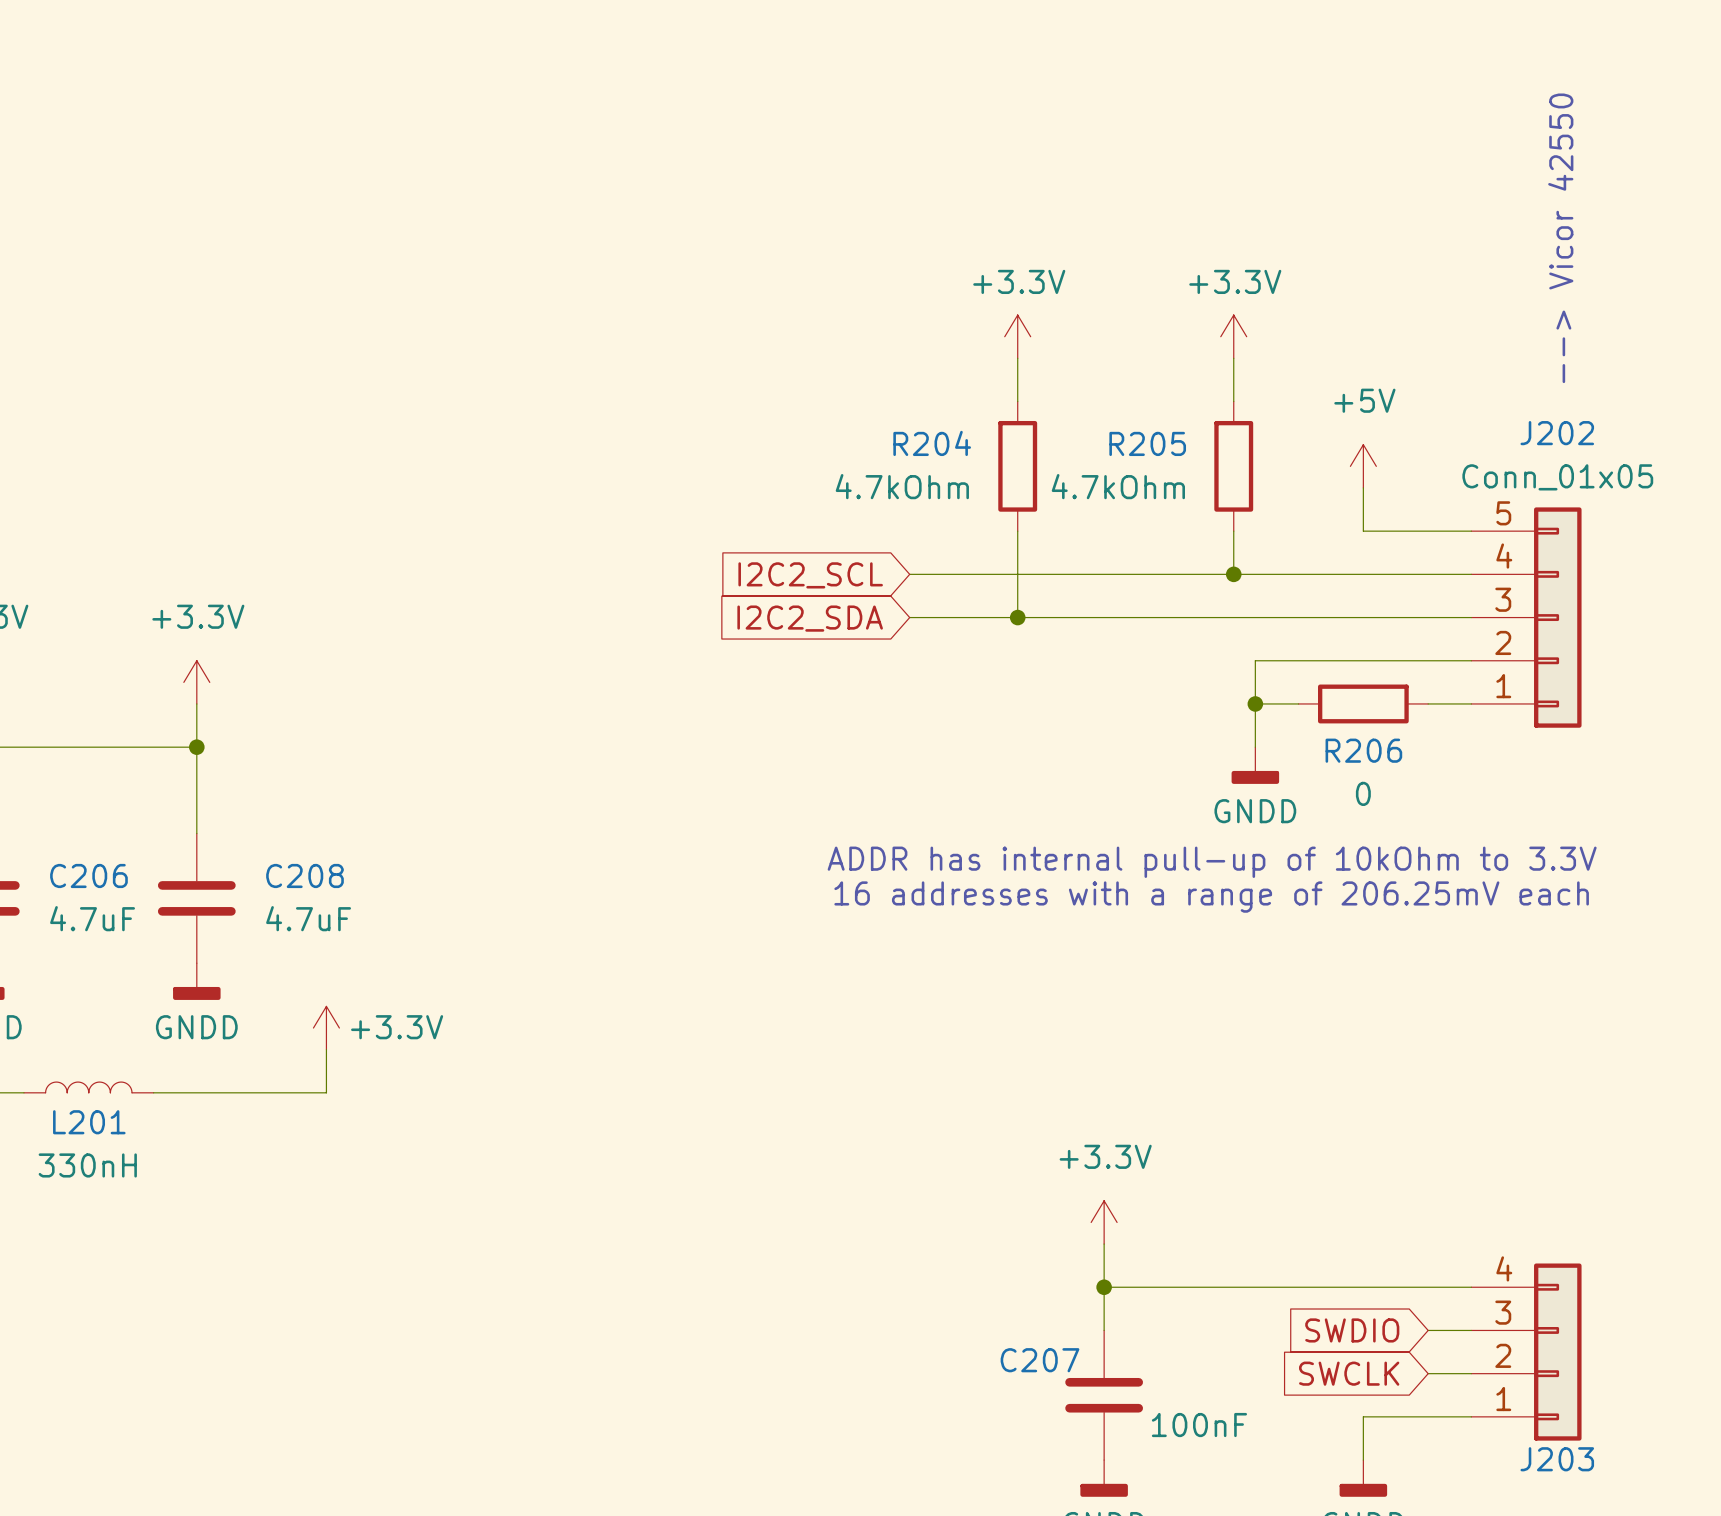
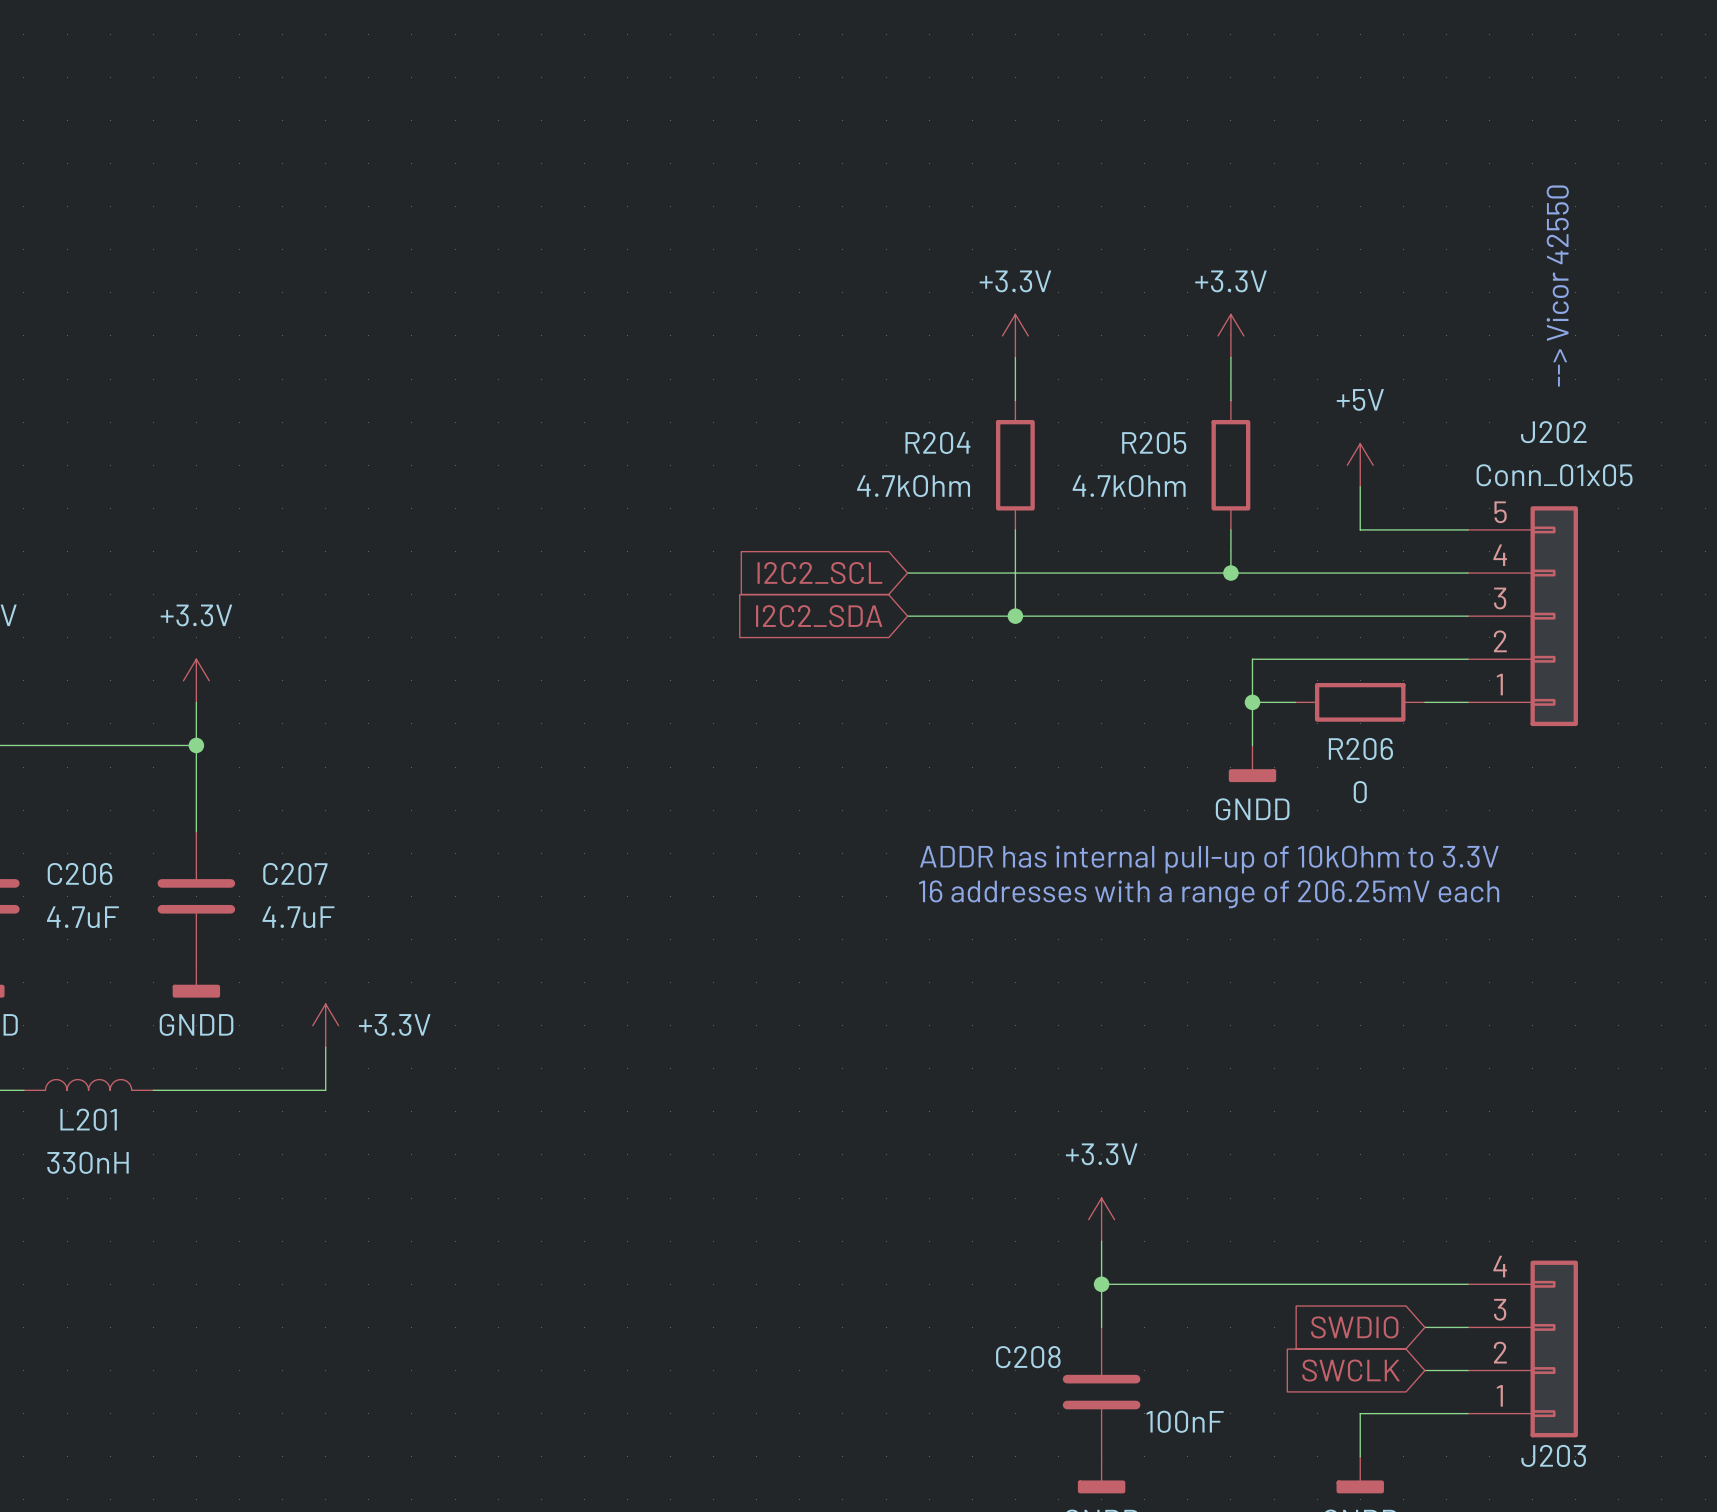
C208 name: C208 (304, 875) -> C207 (295, 874)
C207 name: C207 (1040, 1360) -> C208 (1028, 1357)

